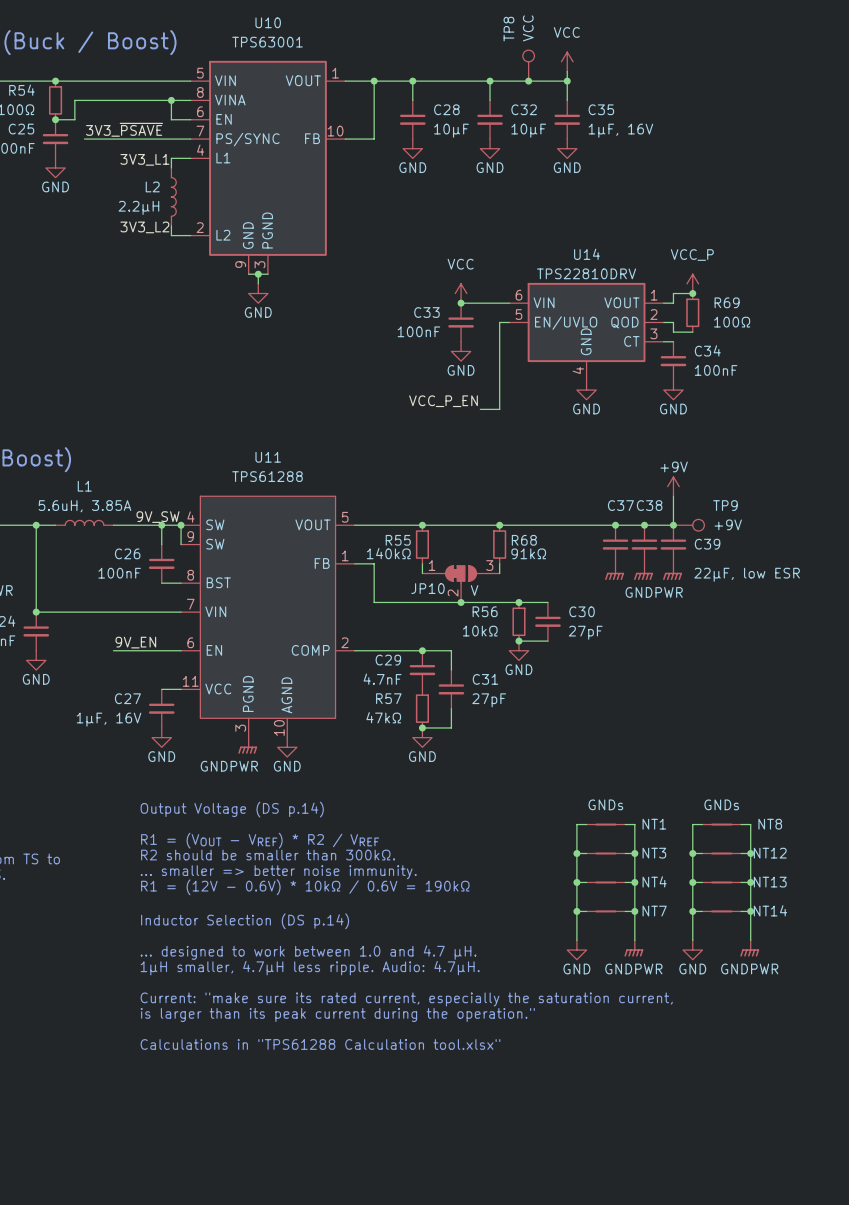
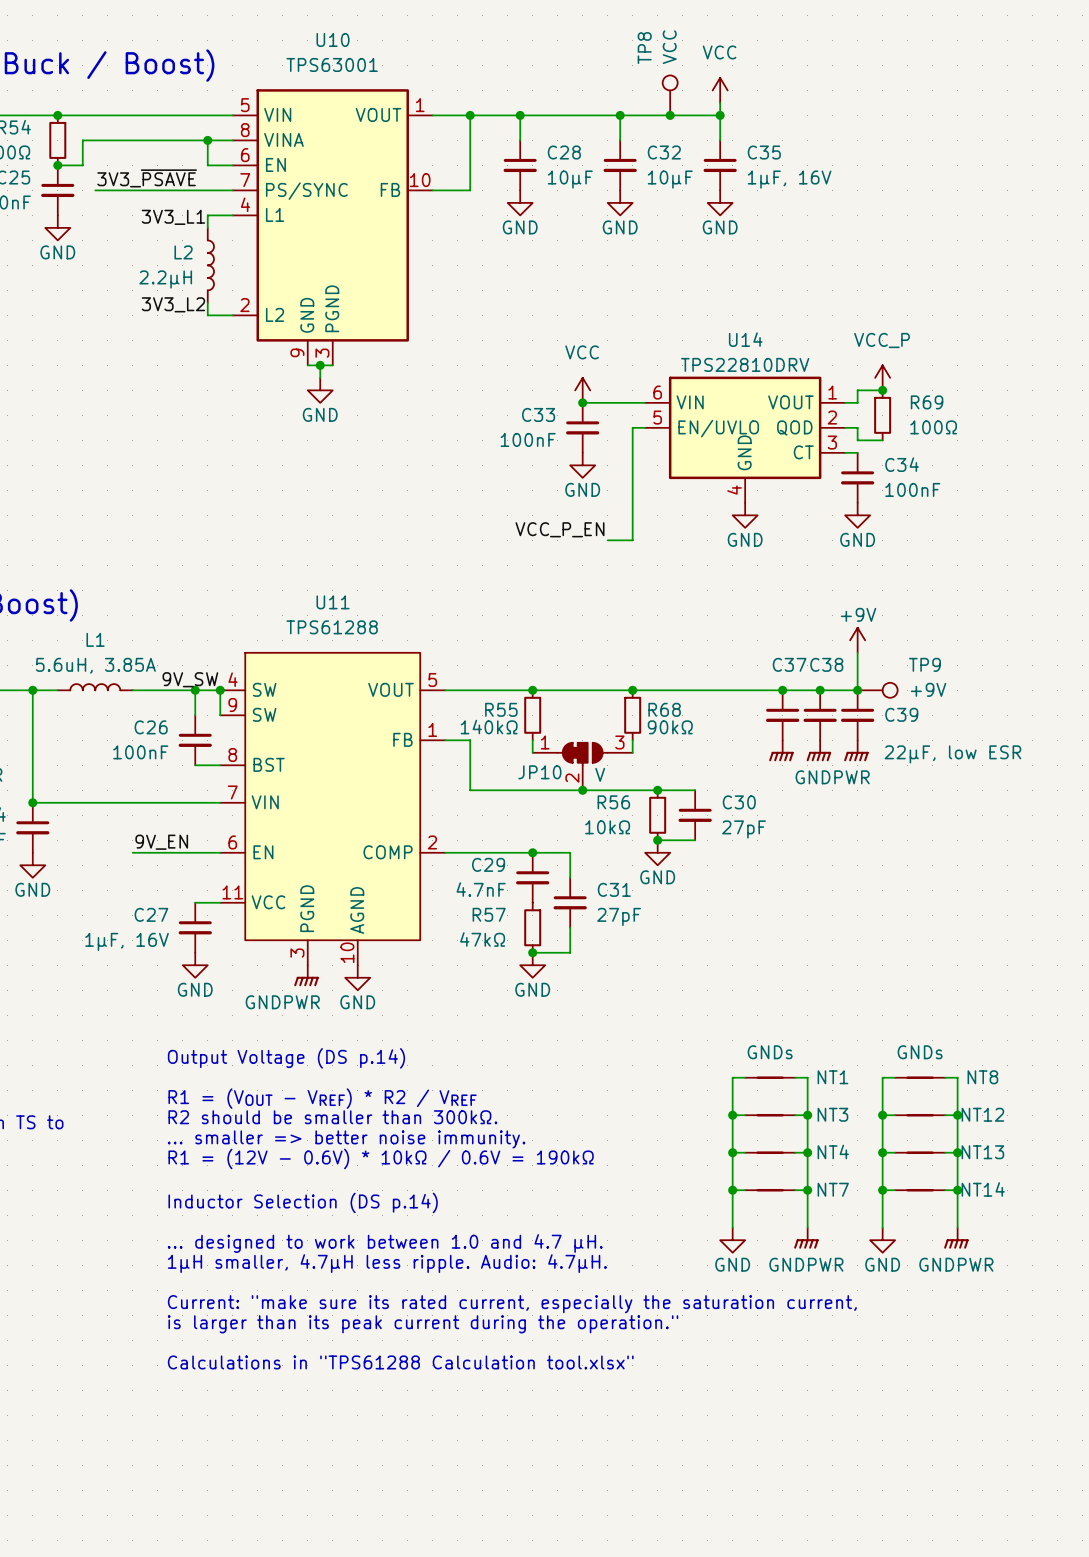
R68 value: 91kΩ (528, 553) -> 90kΩ (670, 727)

